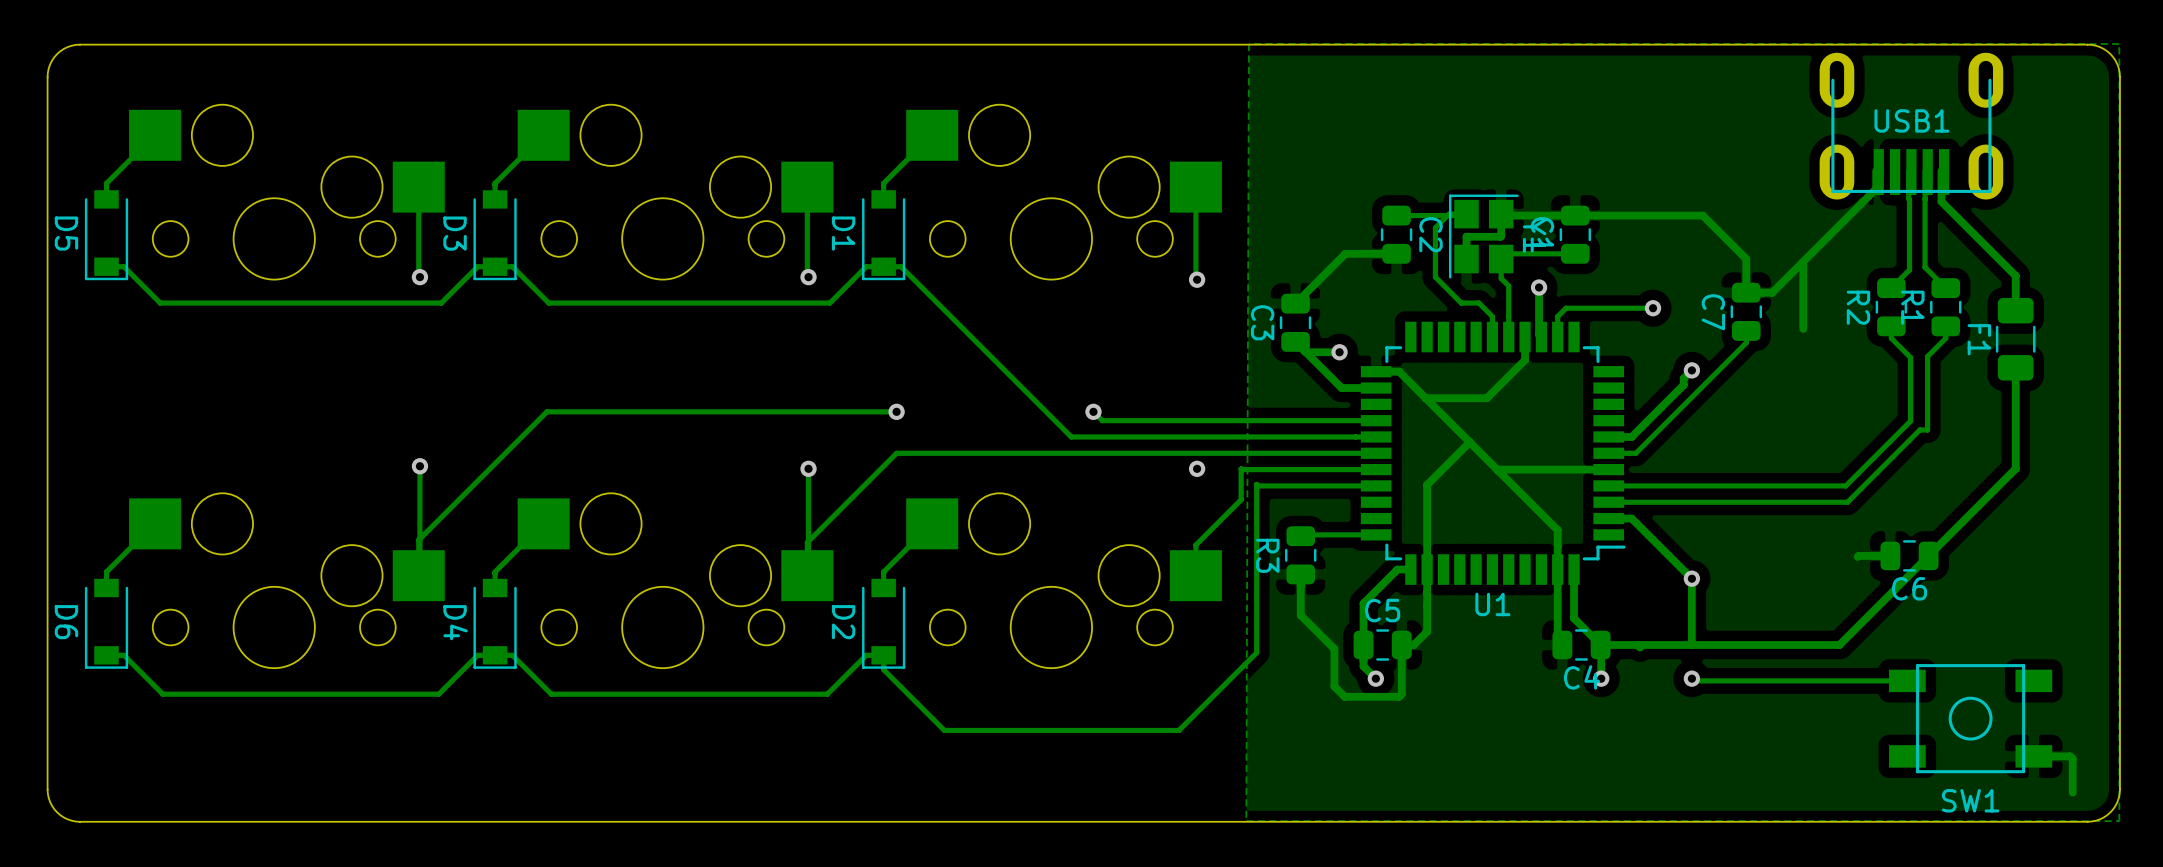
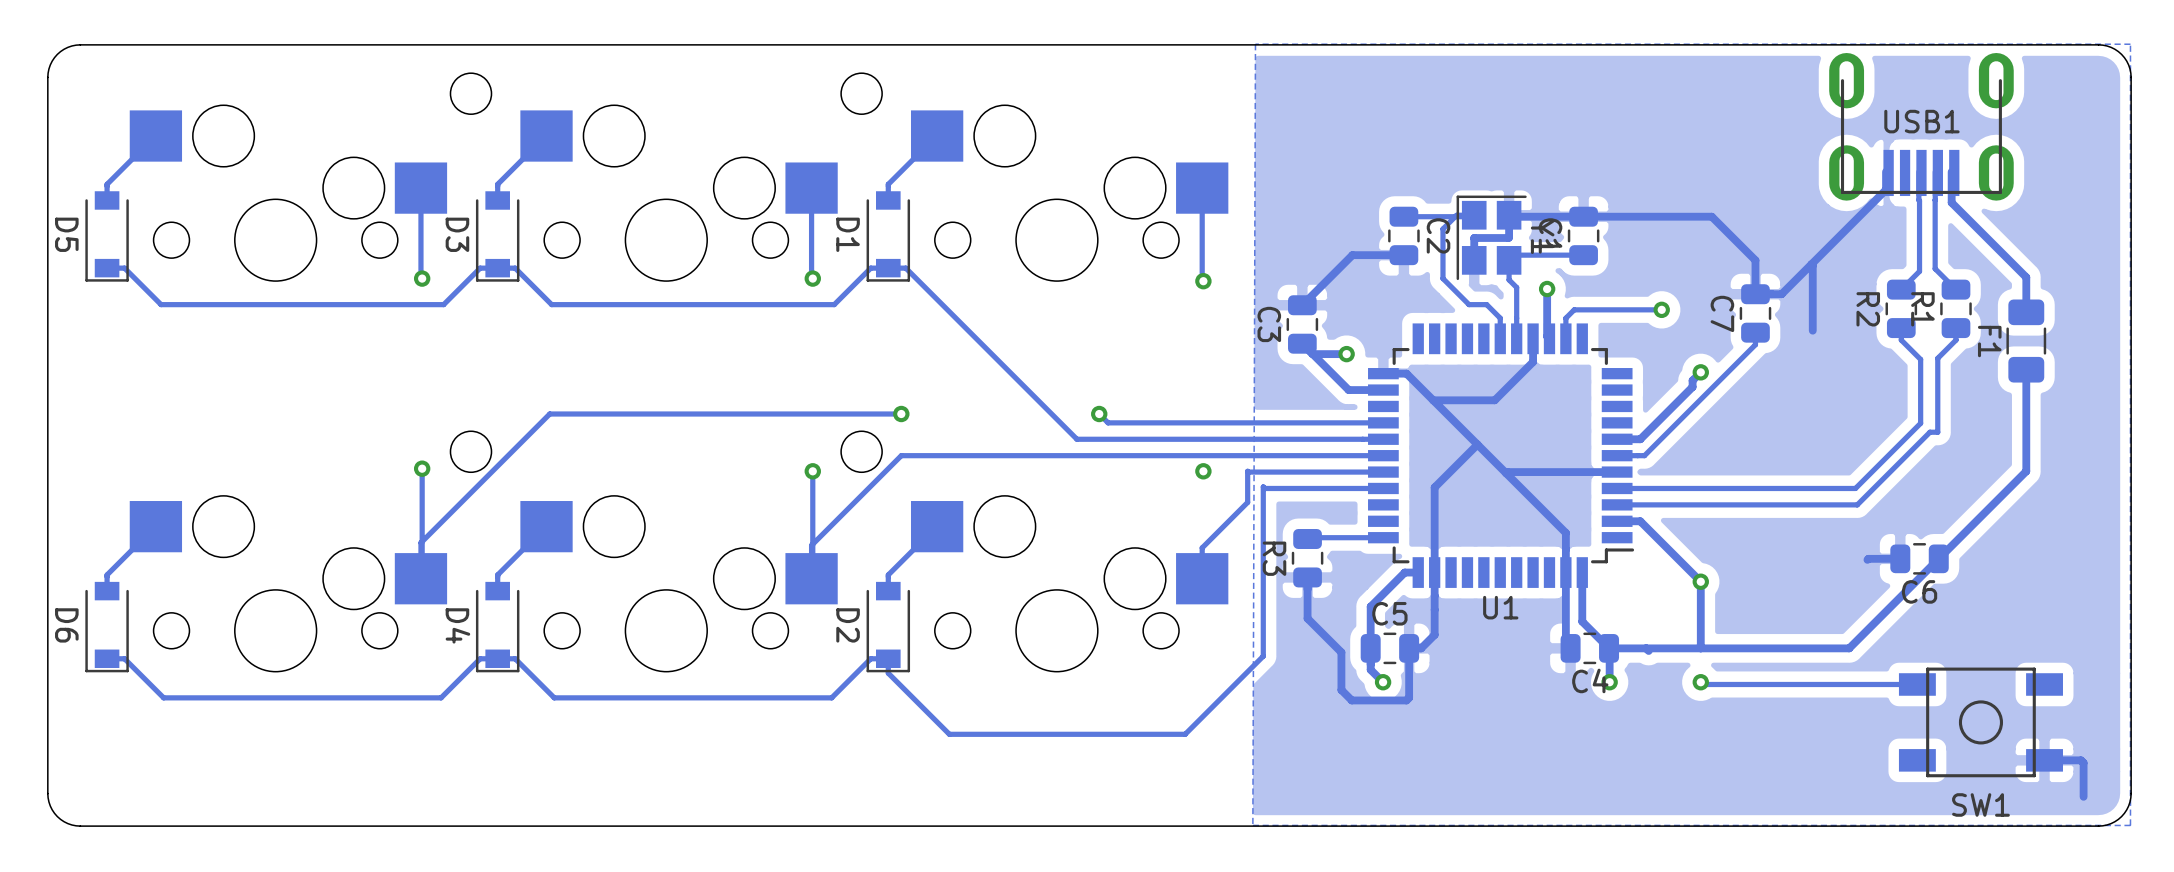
round board edge: none -> [449, 72, 493, 115]
round board edge: none -> [840, 72, 883, 115]
round board edge: none -> [449, 430, 493, 473]
round board edge: none -> [840, 430, 883, 473]

